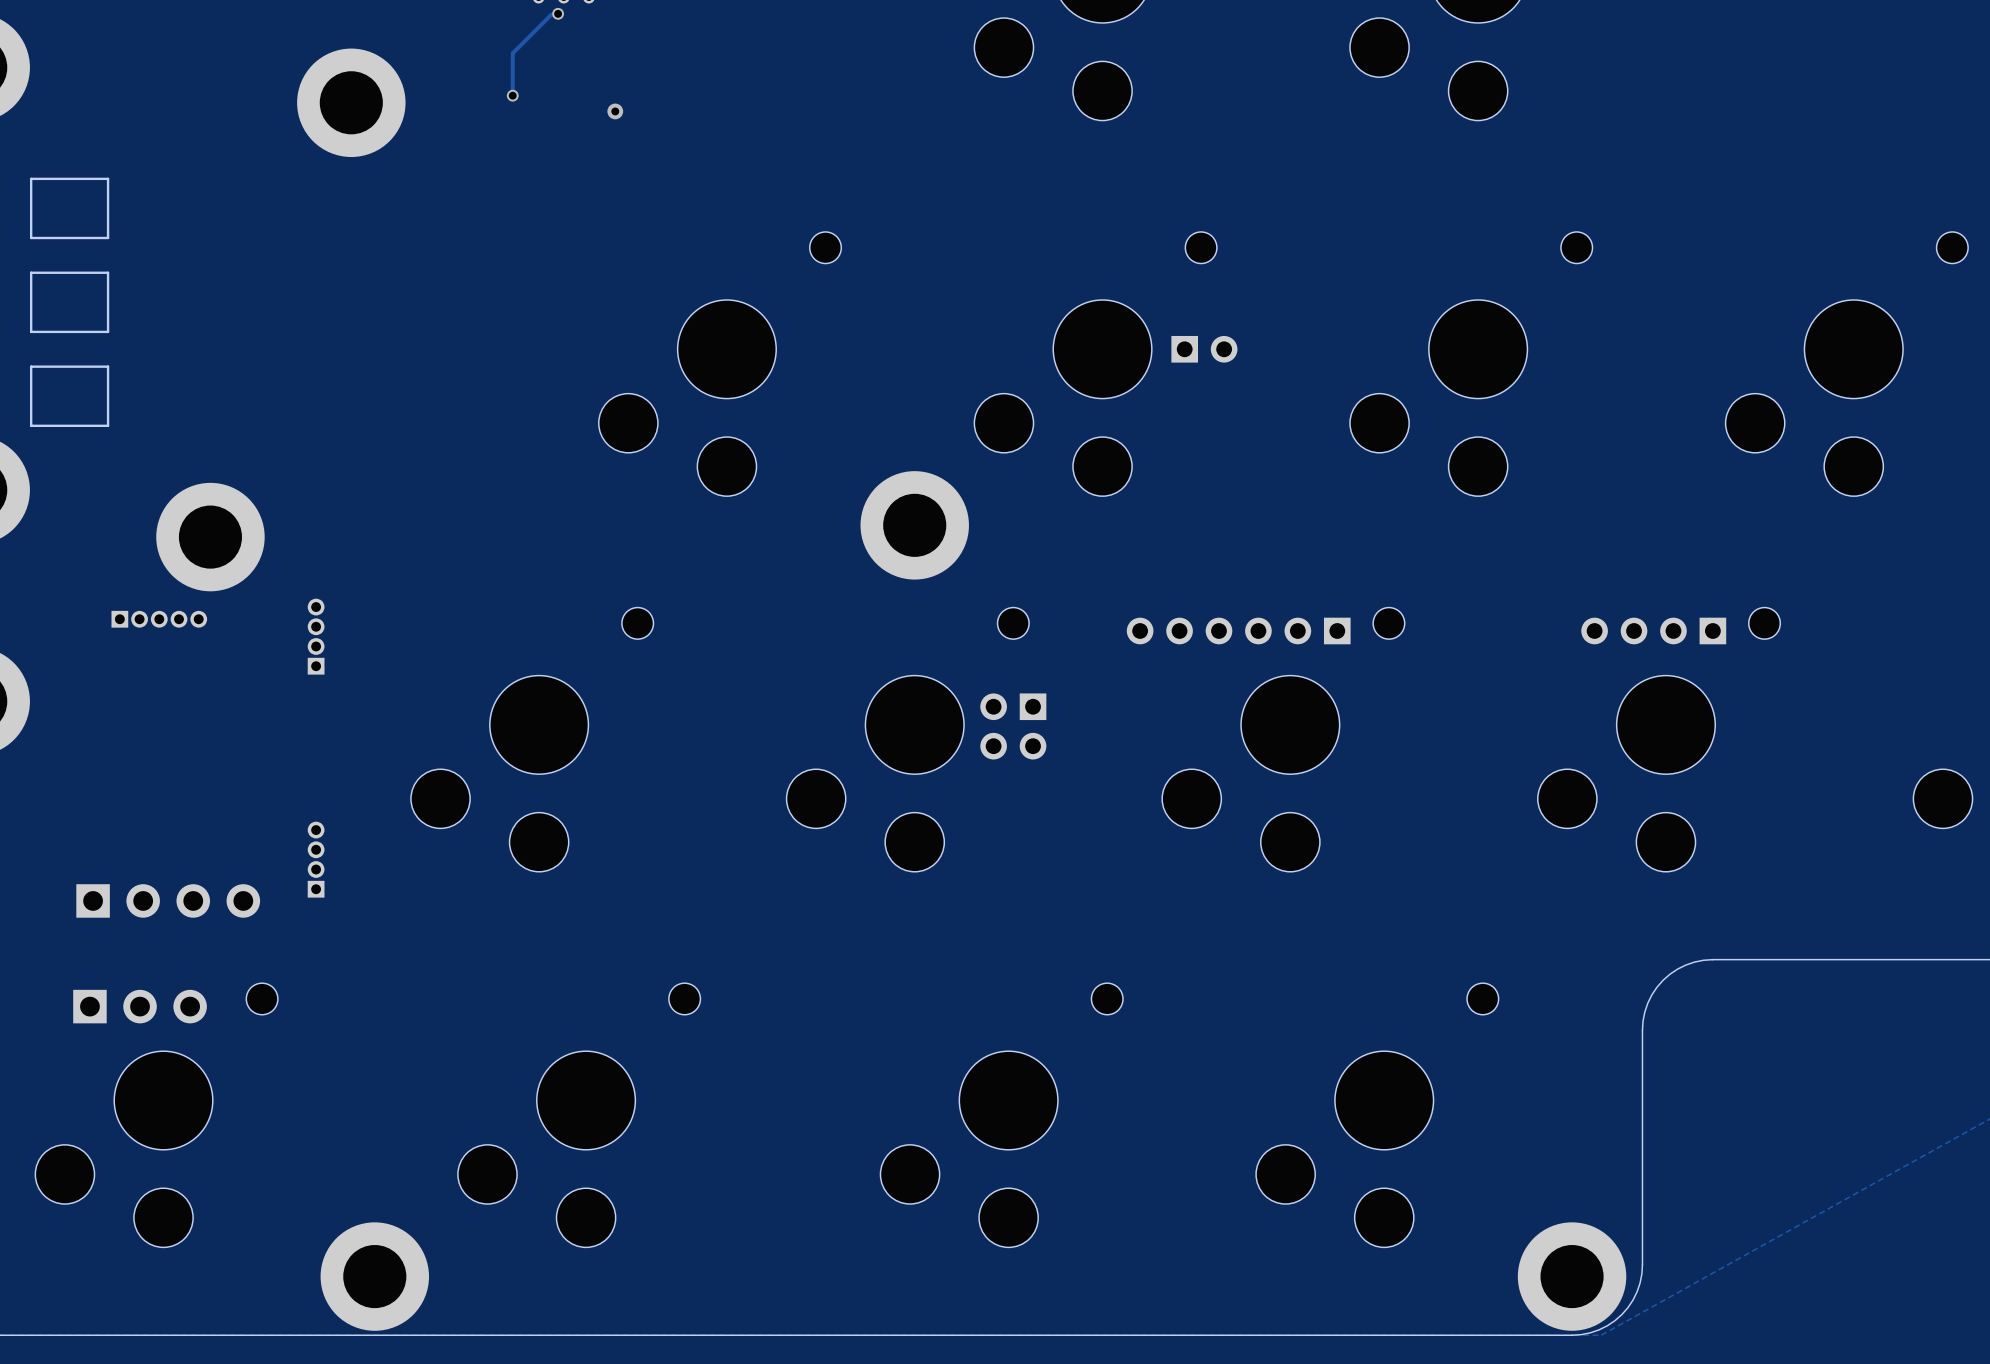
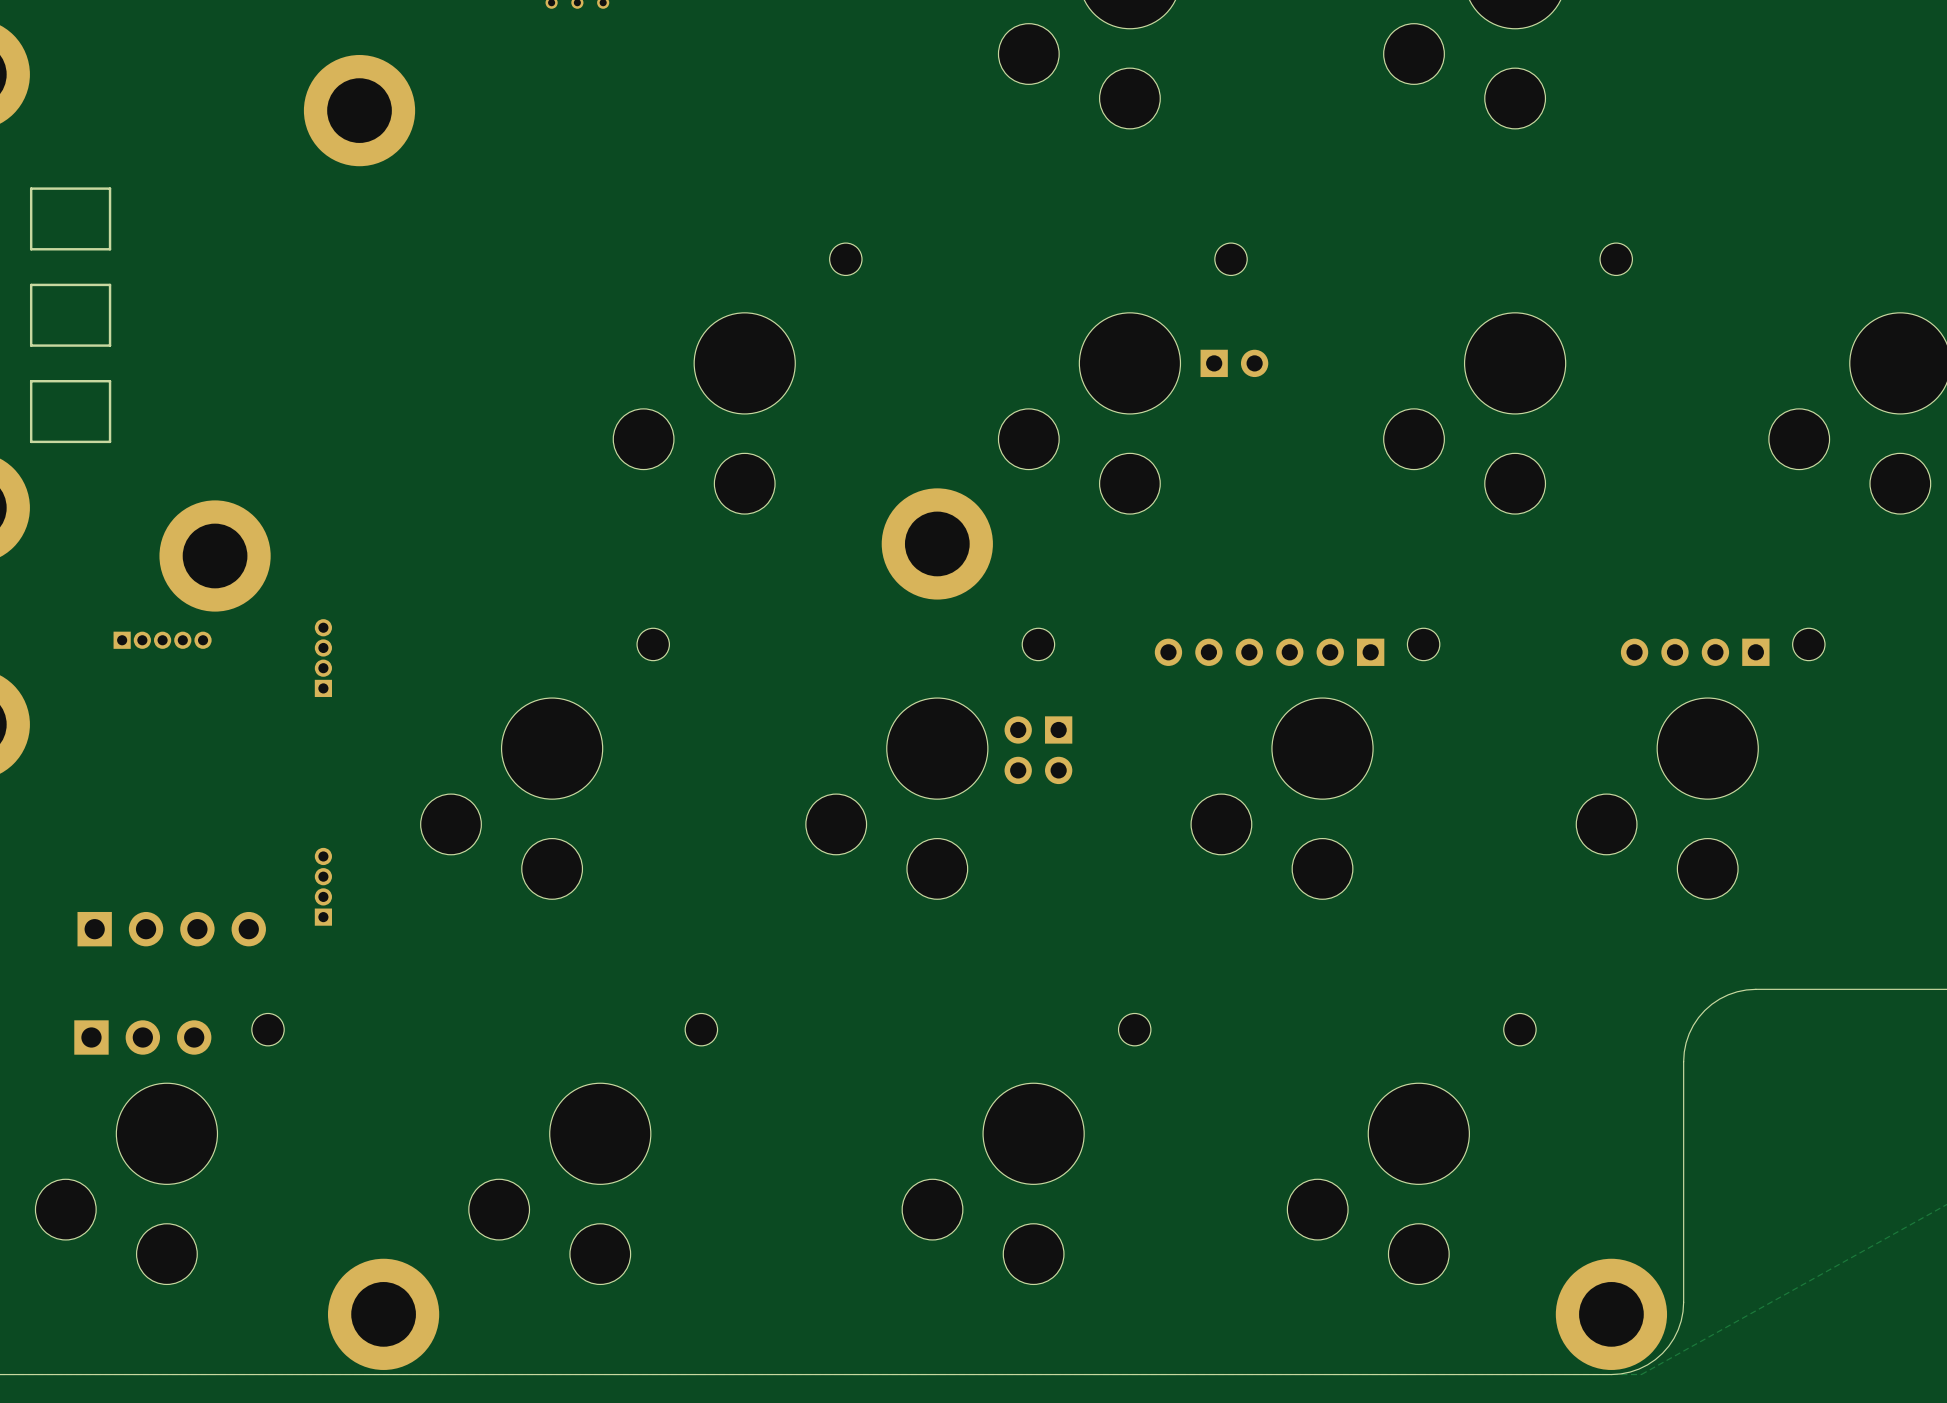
track: (558, 13) (551, 14) (512, 53) (512, 95) -> none
via: (558, 13) -> none
via: (512, 95) -> none
via: (615, 111) -> none

